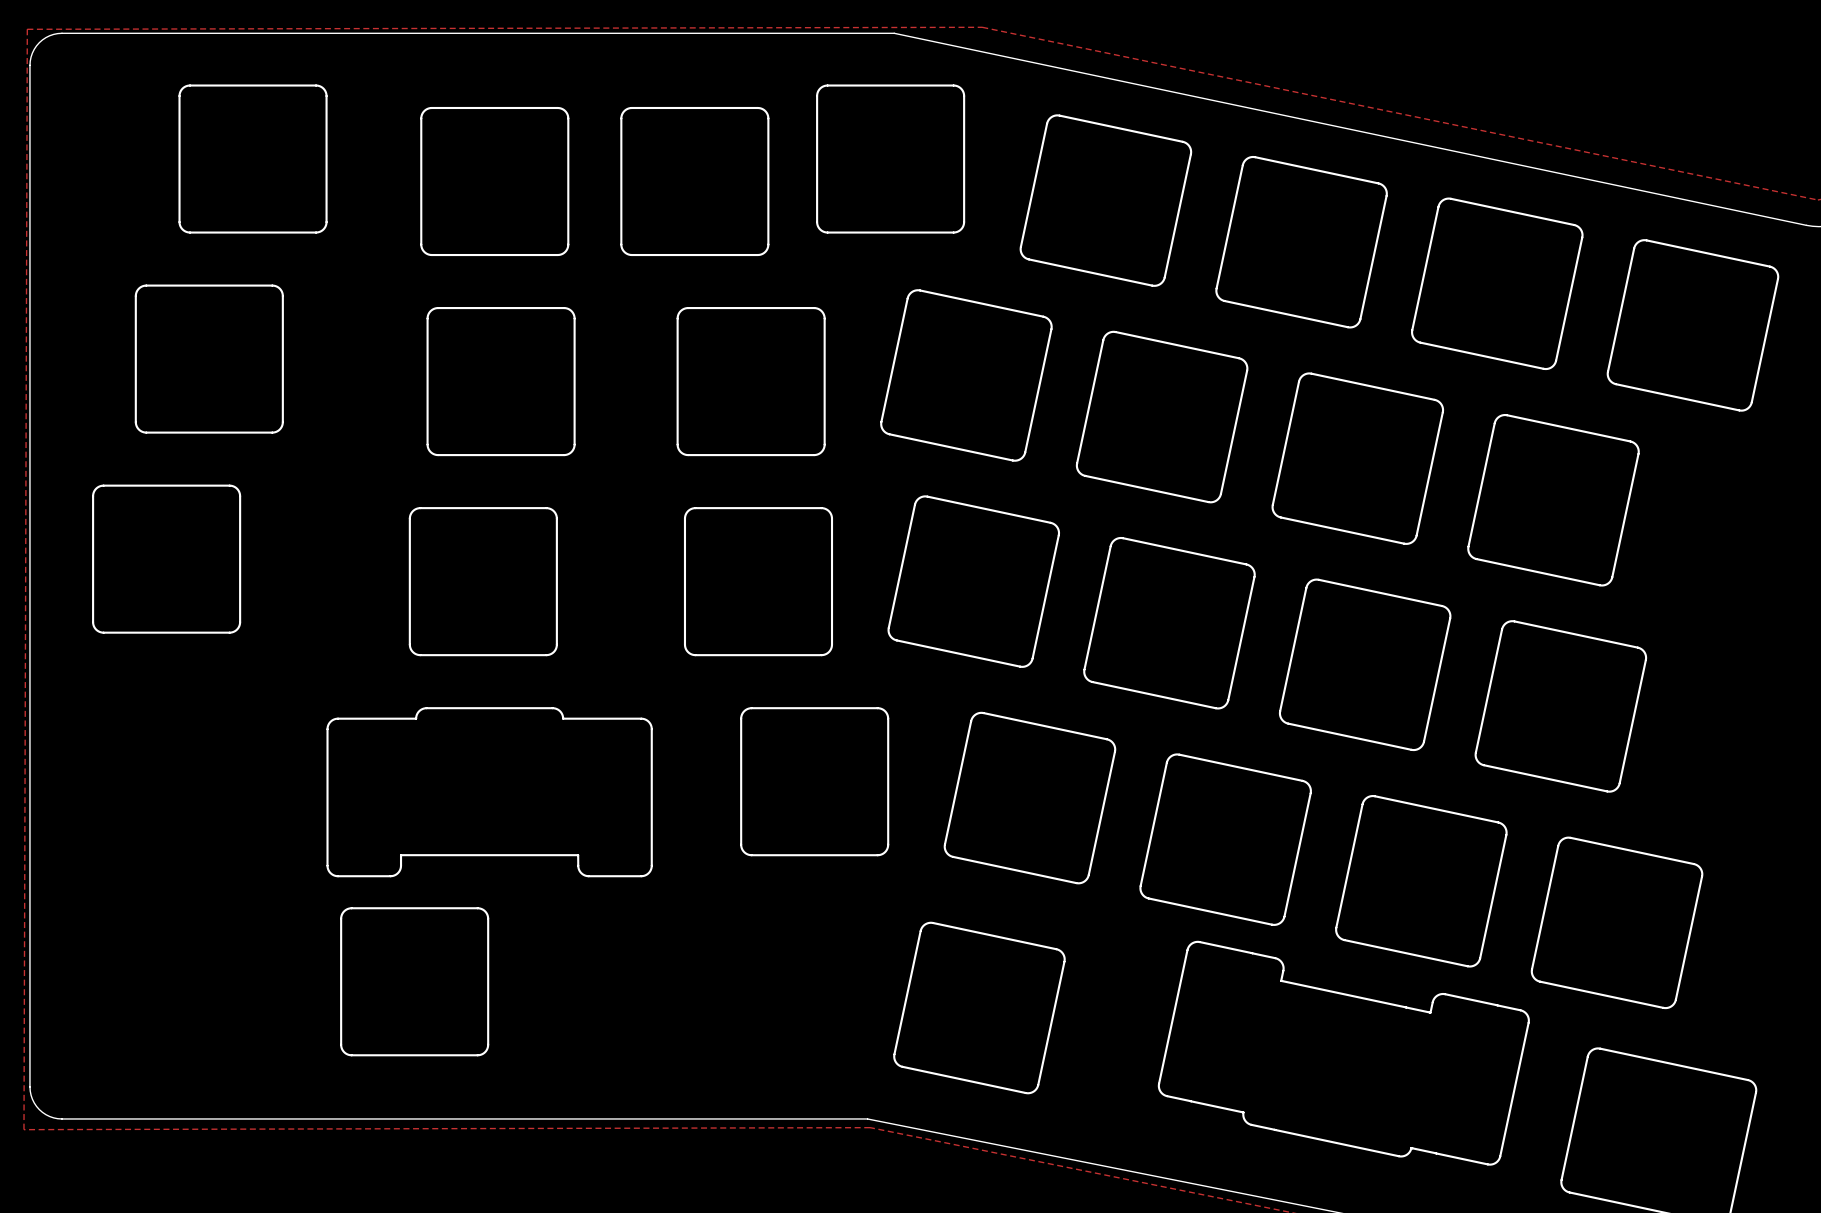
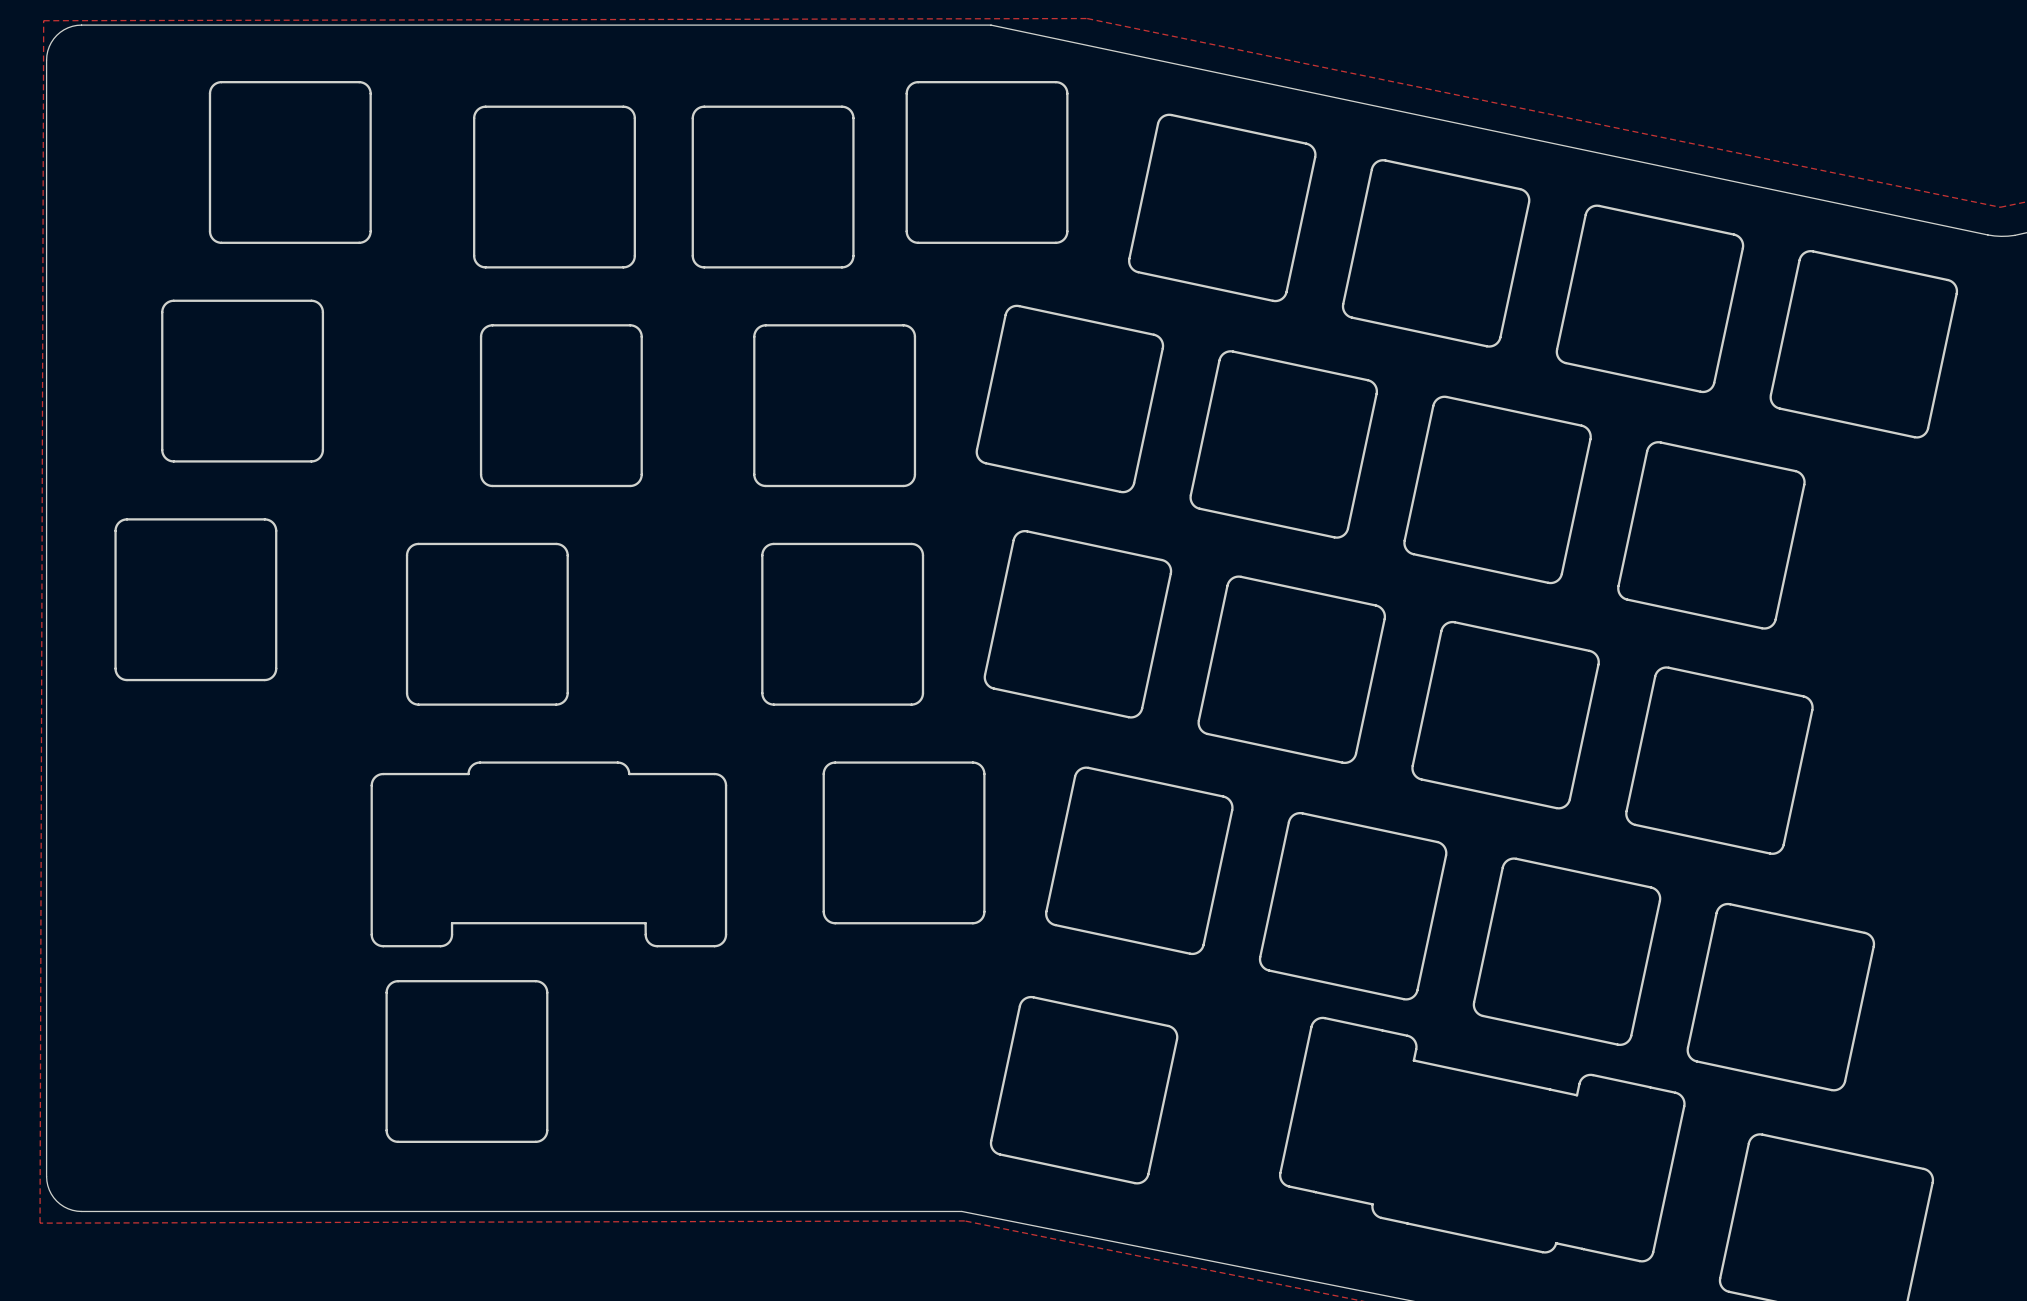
board edge: (420, 508) (412, 511) (409, 517) (409, 644) (412, 652) (420, 655) -> (473, 543) (417, 544) (410, 547) (407, 555) (407, 697) (411, 702) (417, 704) (473, 704)
board edge: (496, 508) (547, 508) (553, 511) (556, 518) (556, 648) (547, 655) (496, 655) -> (556, 543) (564, 547) (567, 555) (567, 694) (563, 702) (556, 704)

